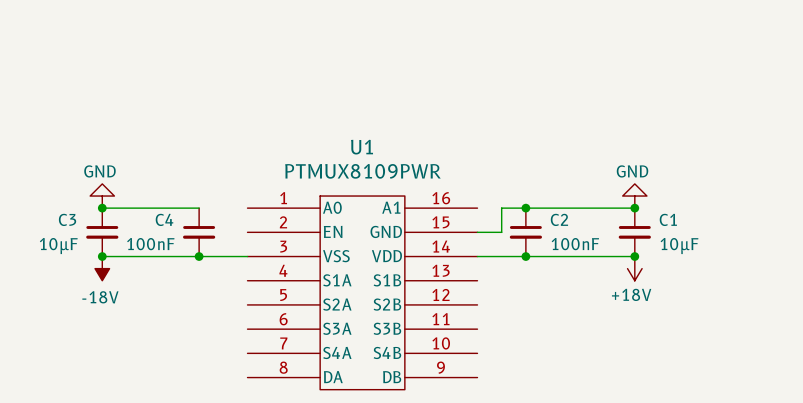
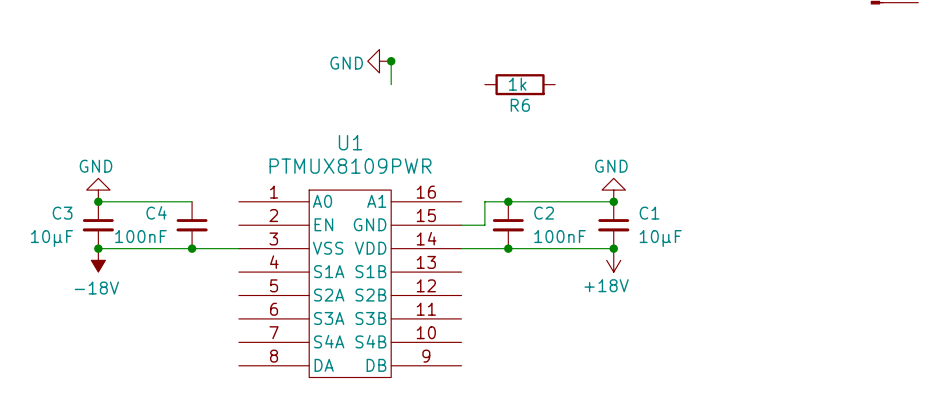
power symbol: none -> GND (379, 61)
wire: none -> (391, 61) (391, 84)
junction: none -> (391, 61)
R6: none -> 1k (520, 84)

